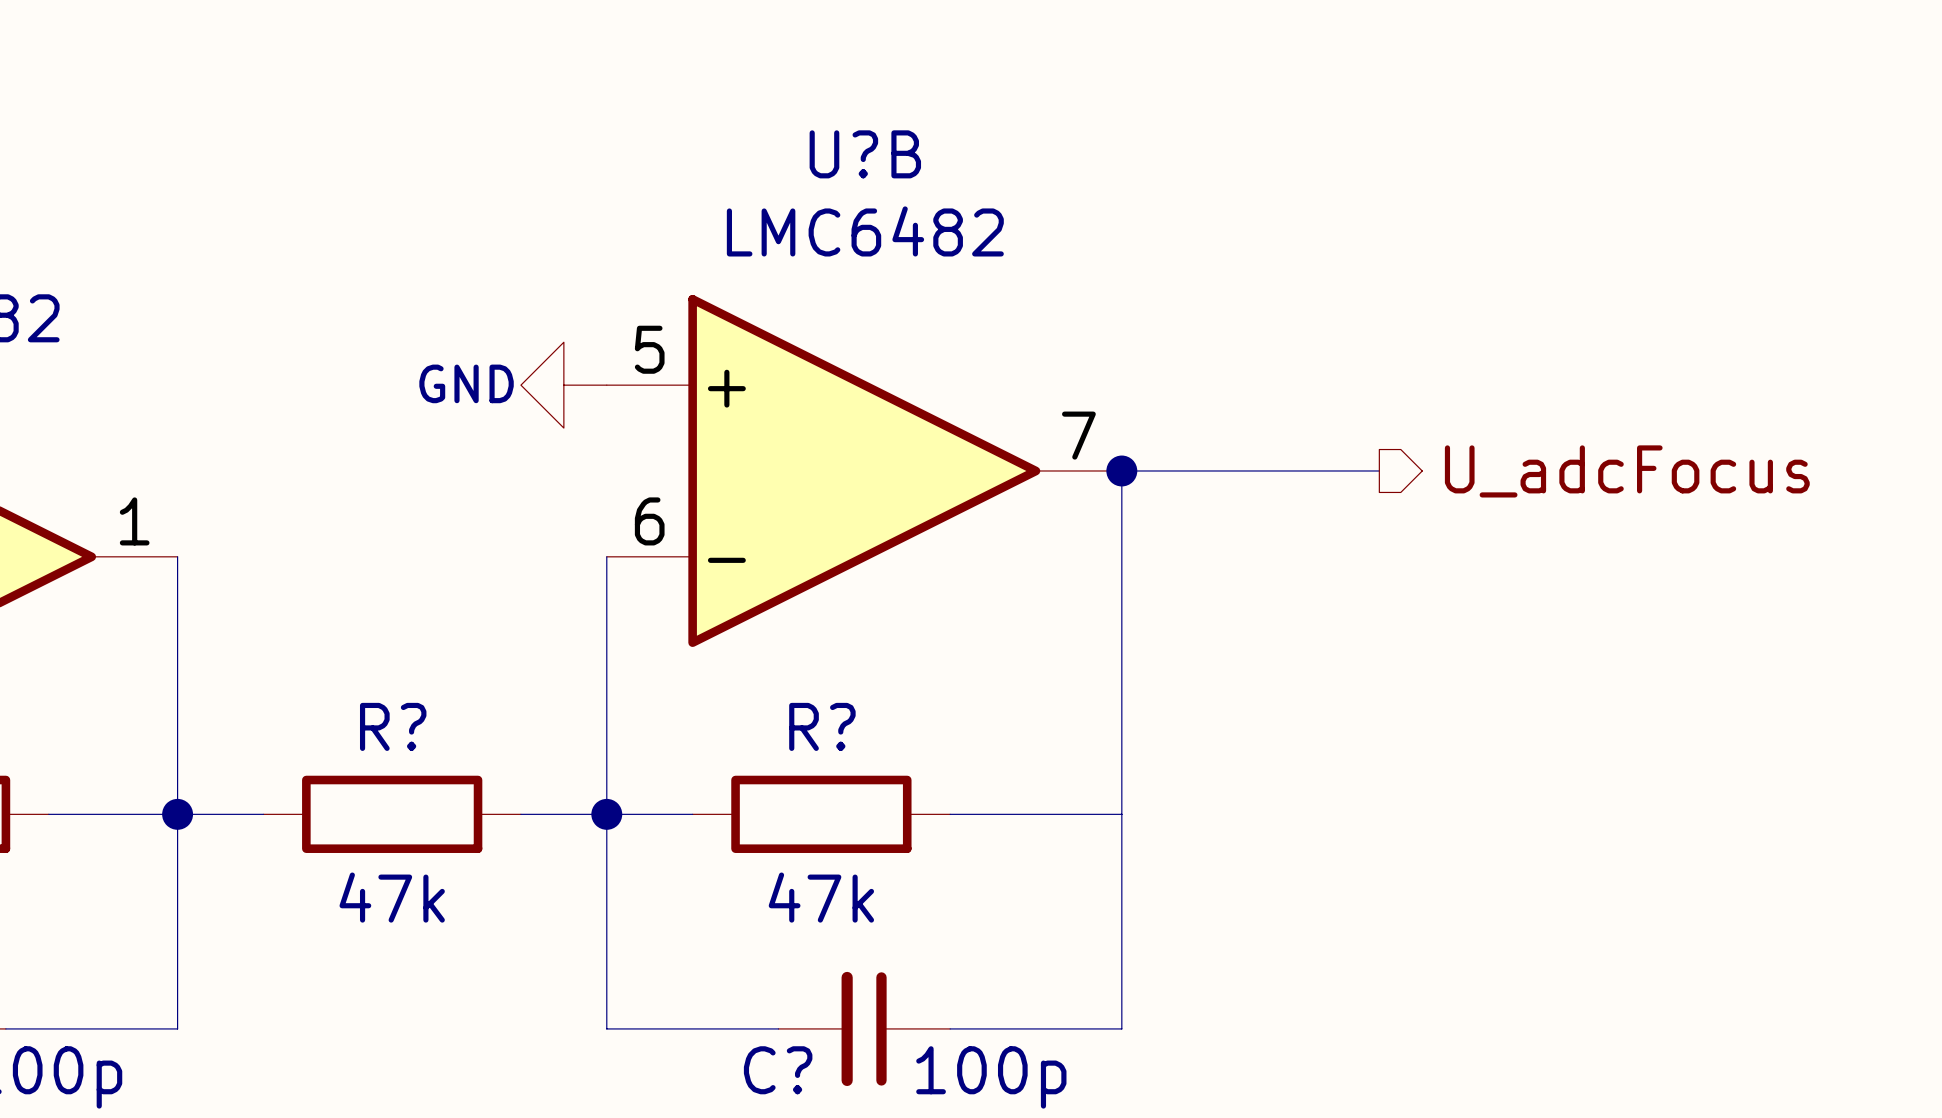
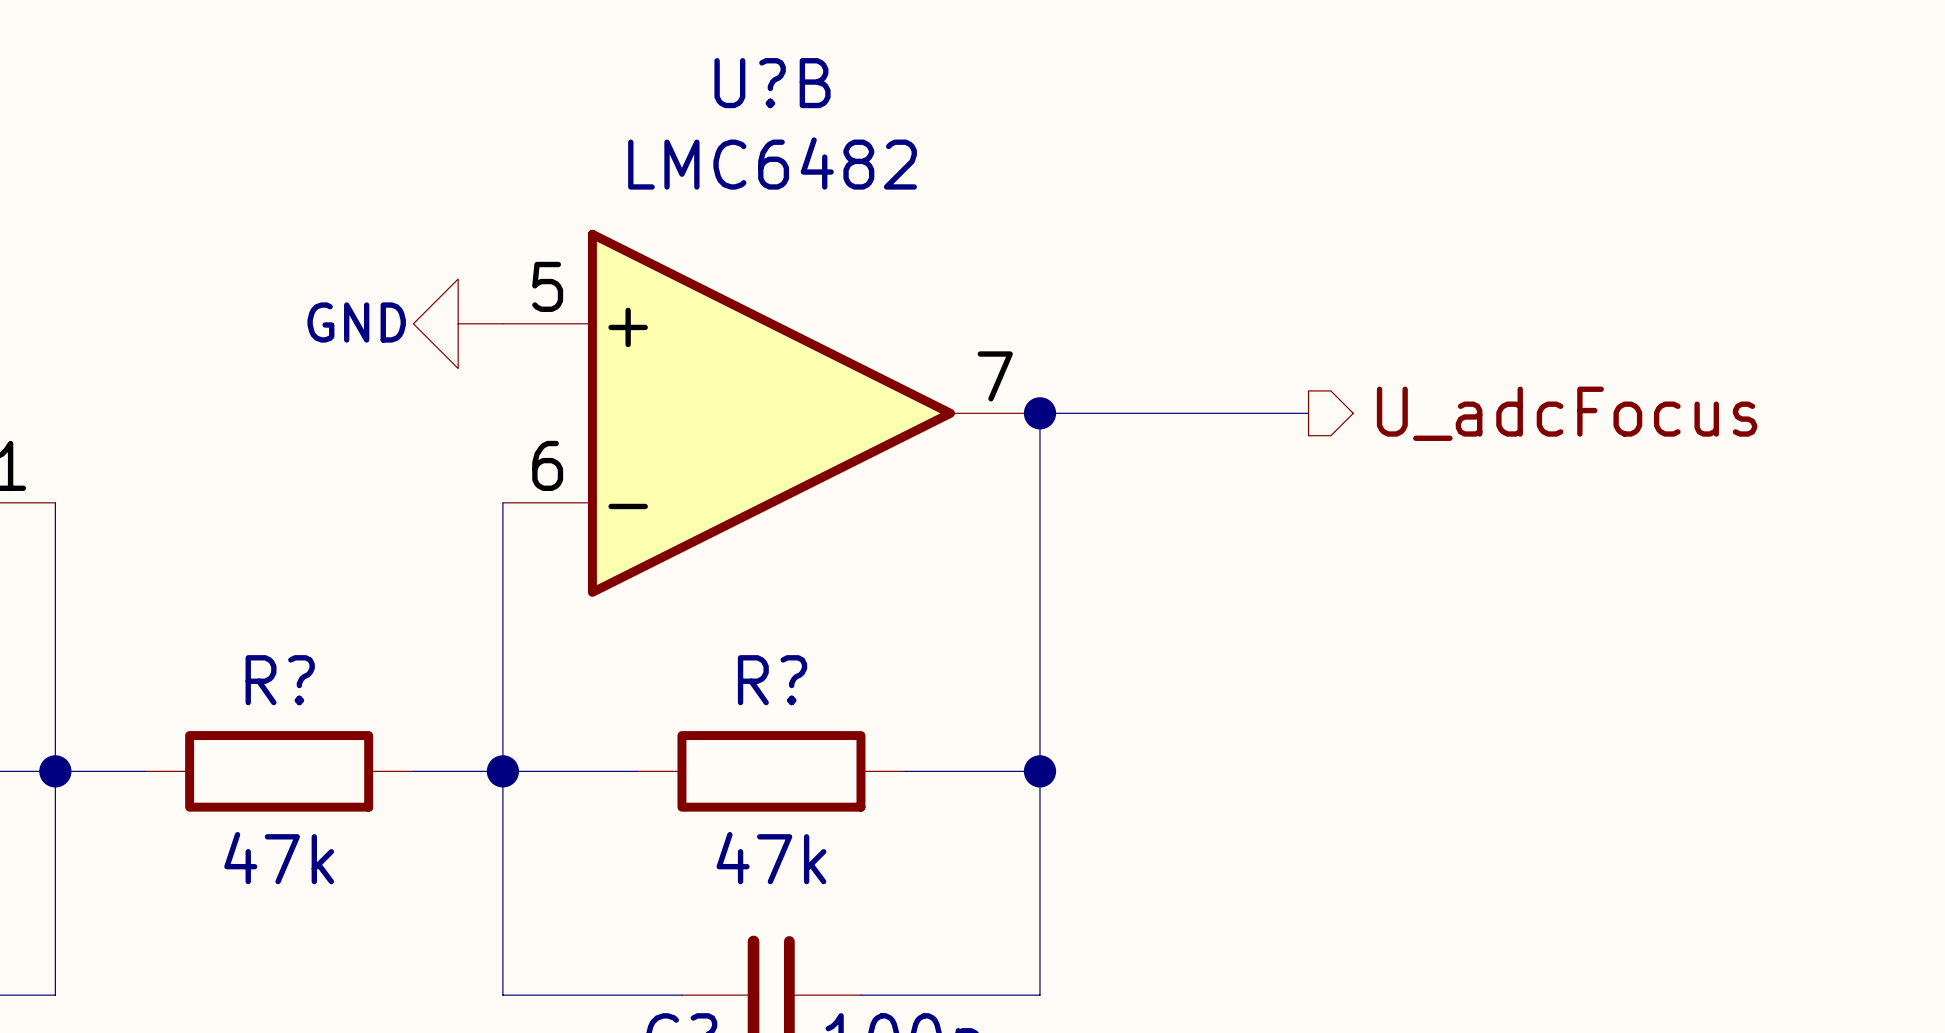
R? position: (821, 814) -> (771, 771)
junction: none -> (1039, 771)

